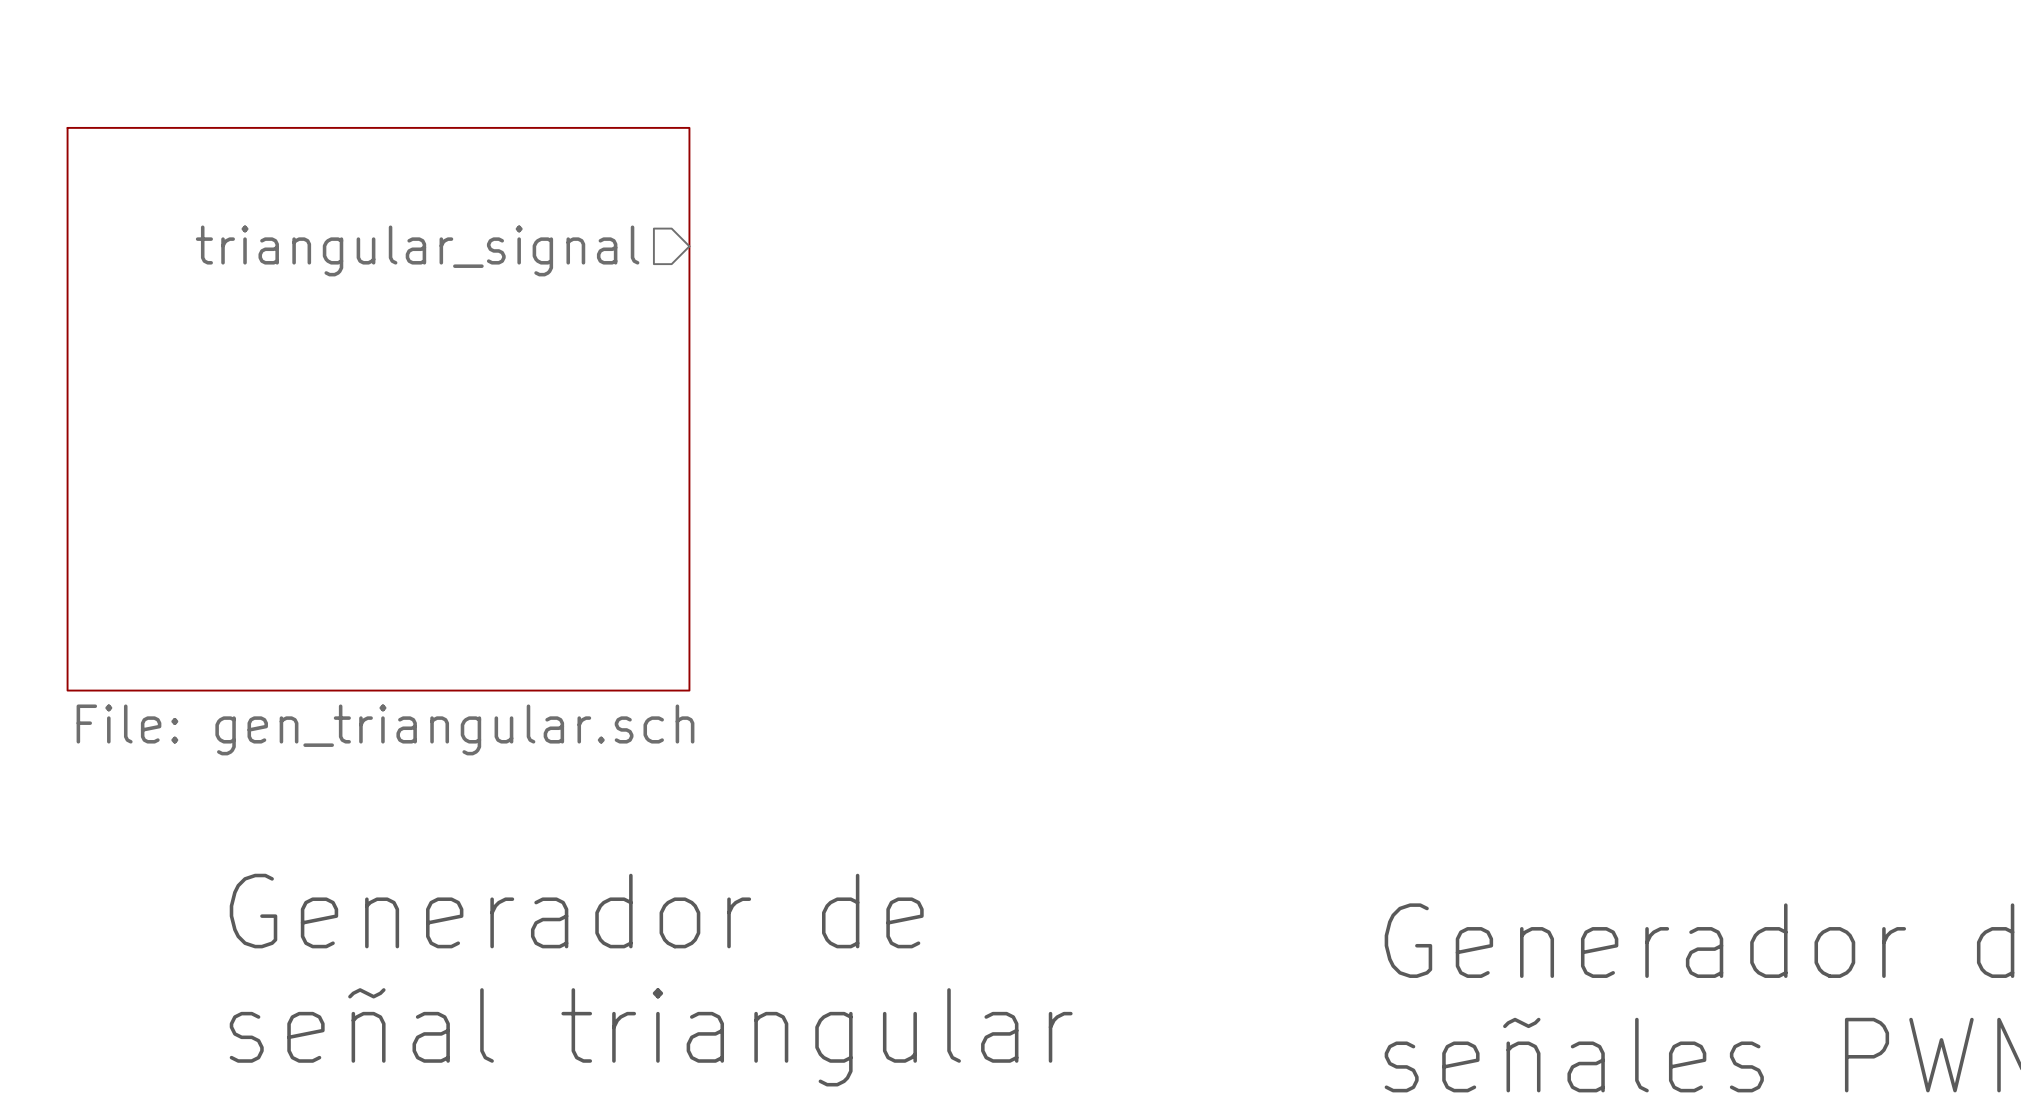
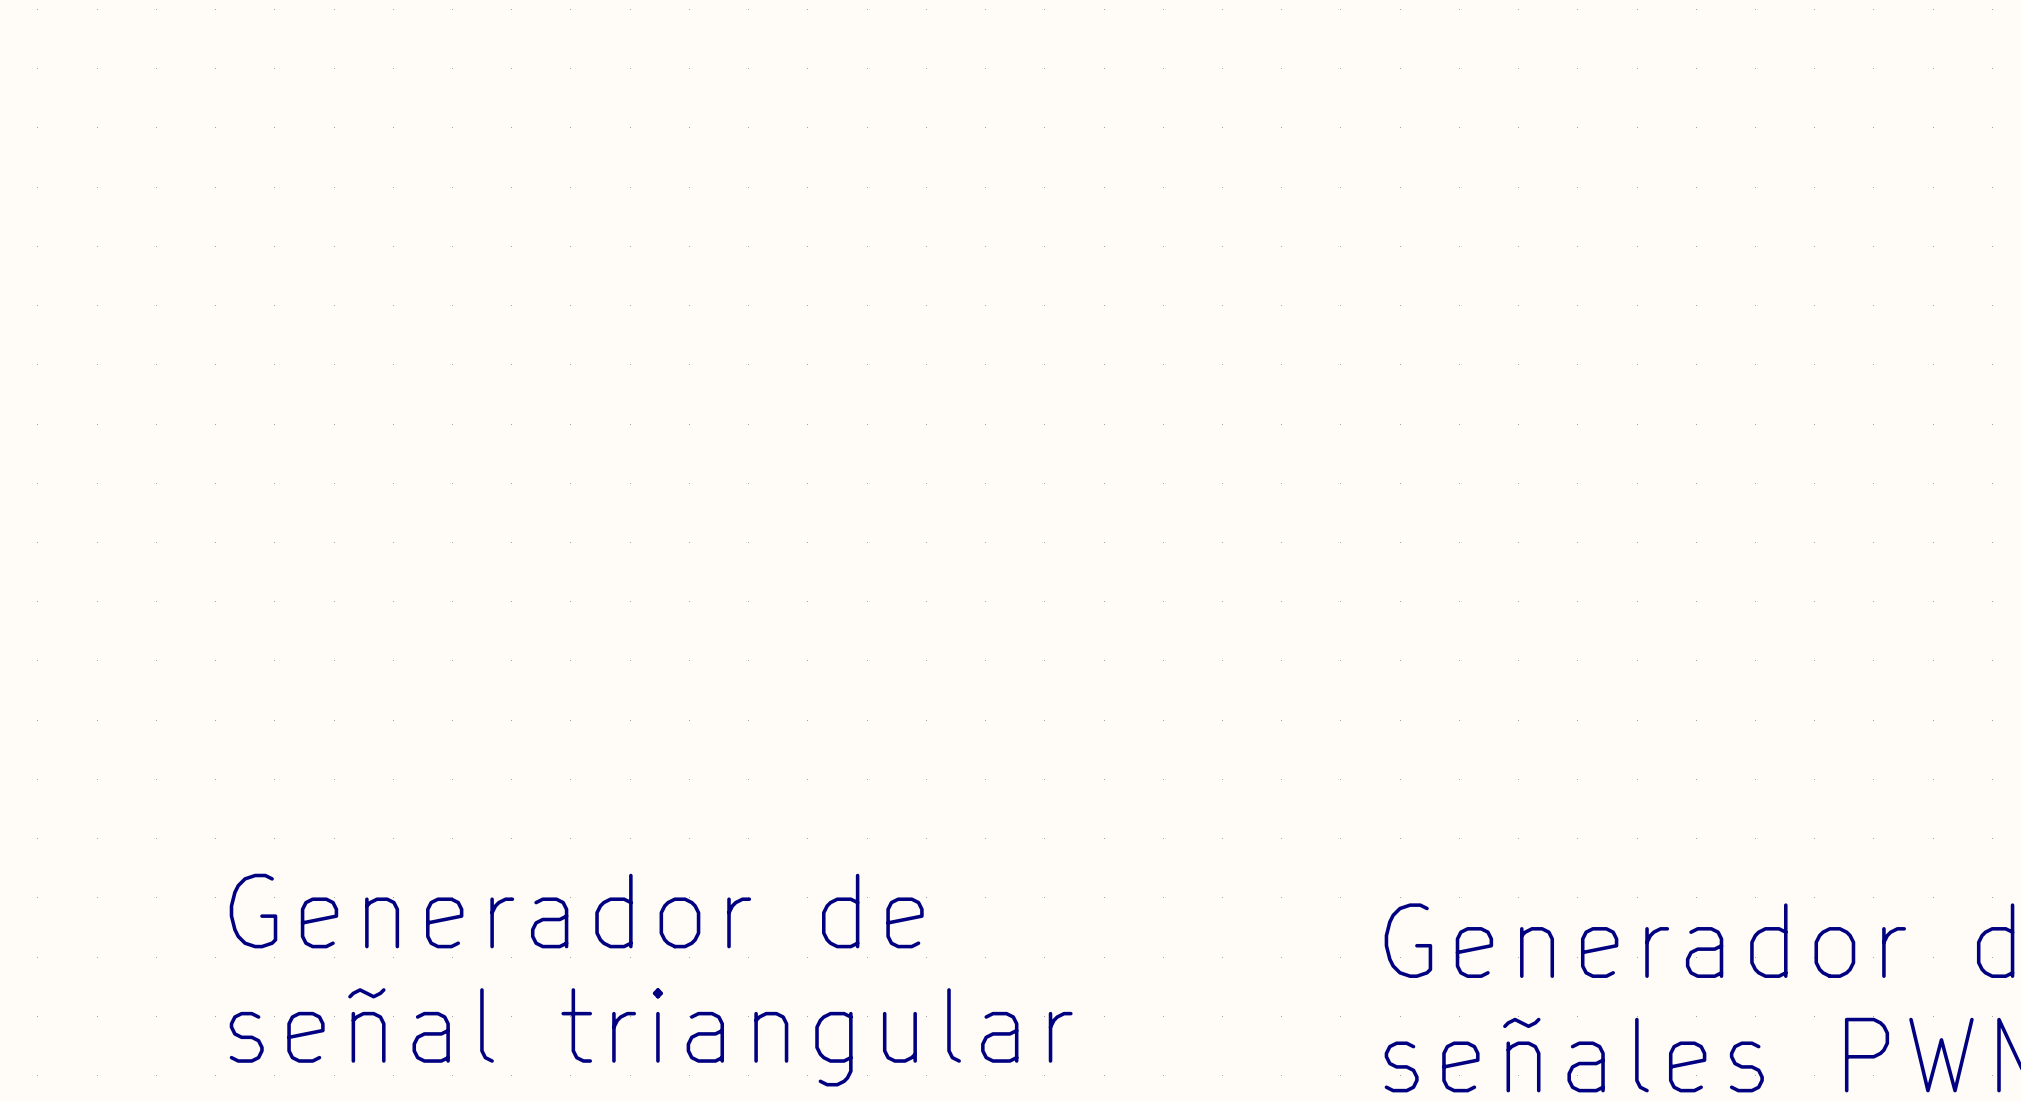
sheet pin: triangular_signal (417, 250) -> none
sheet: File: gen_triangular.sch (378, 409) -> none

